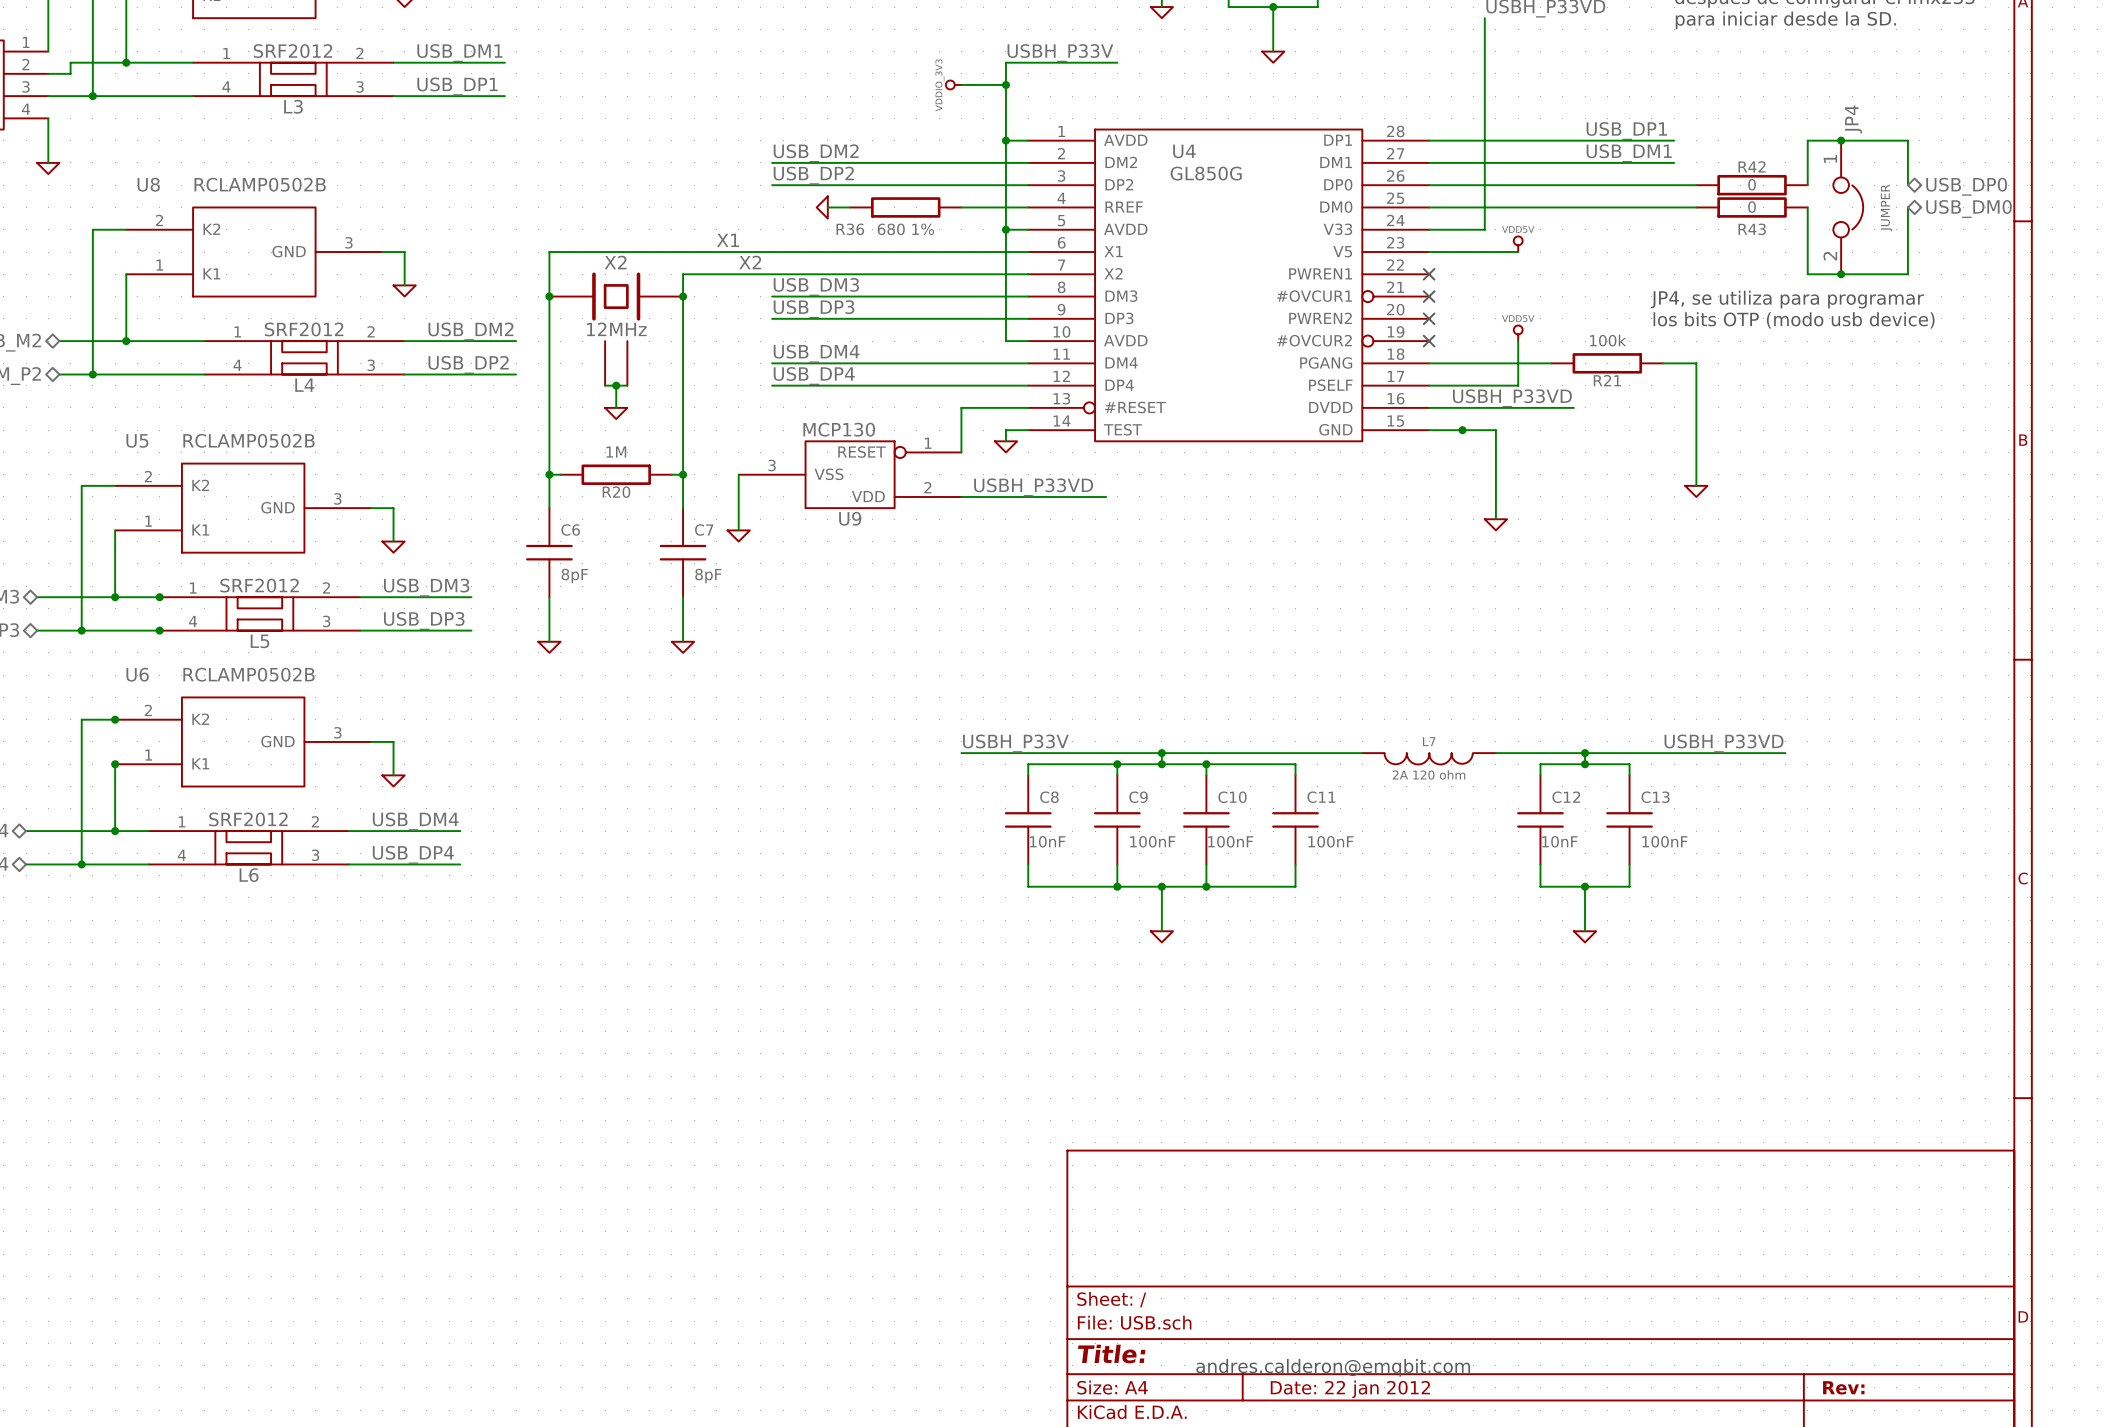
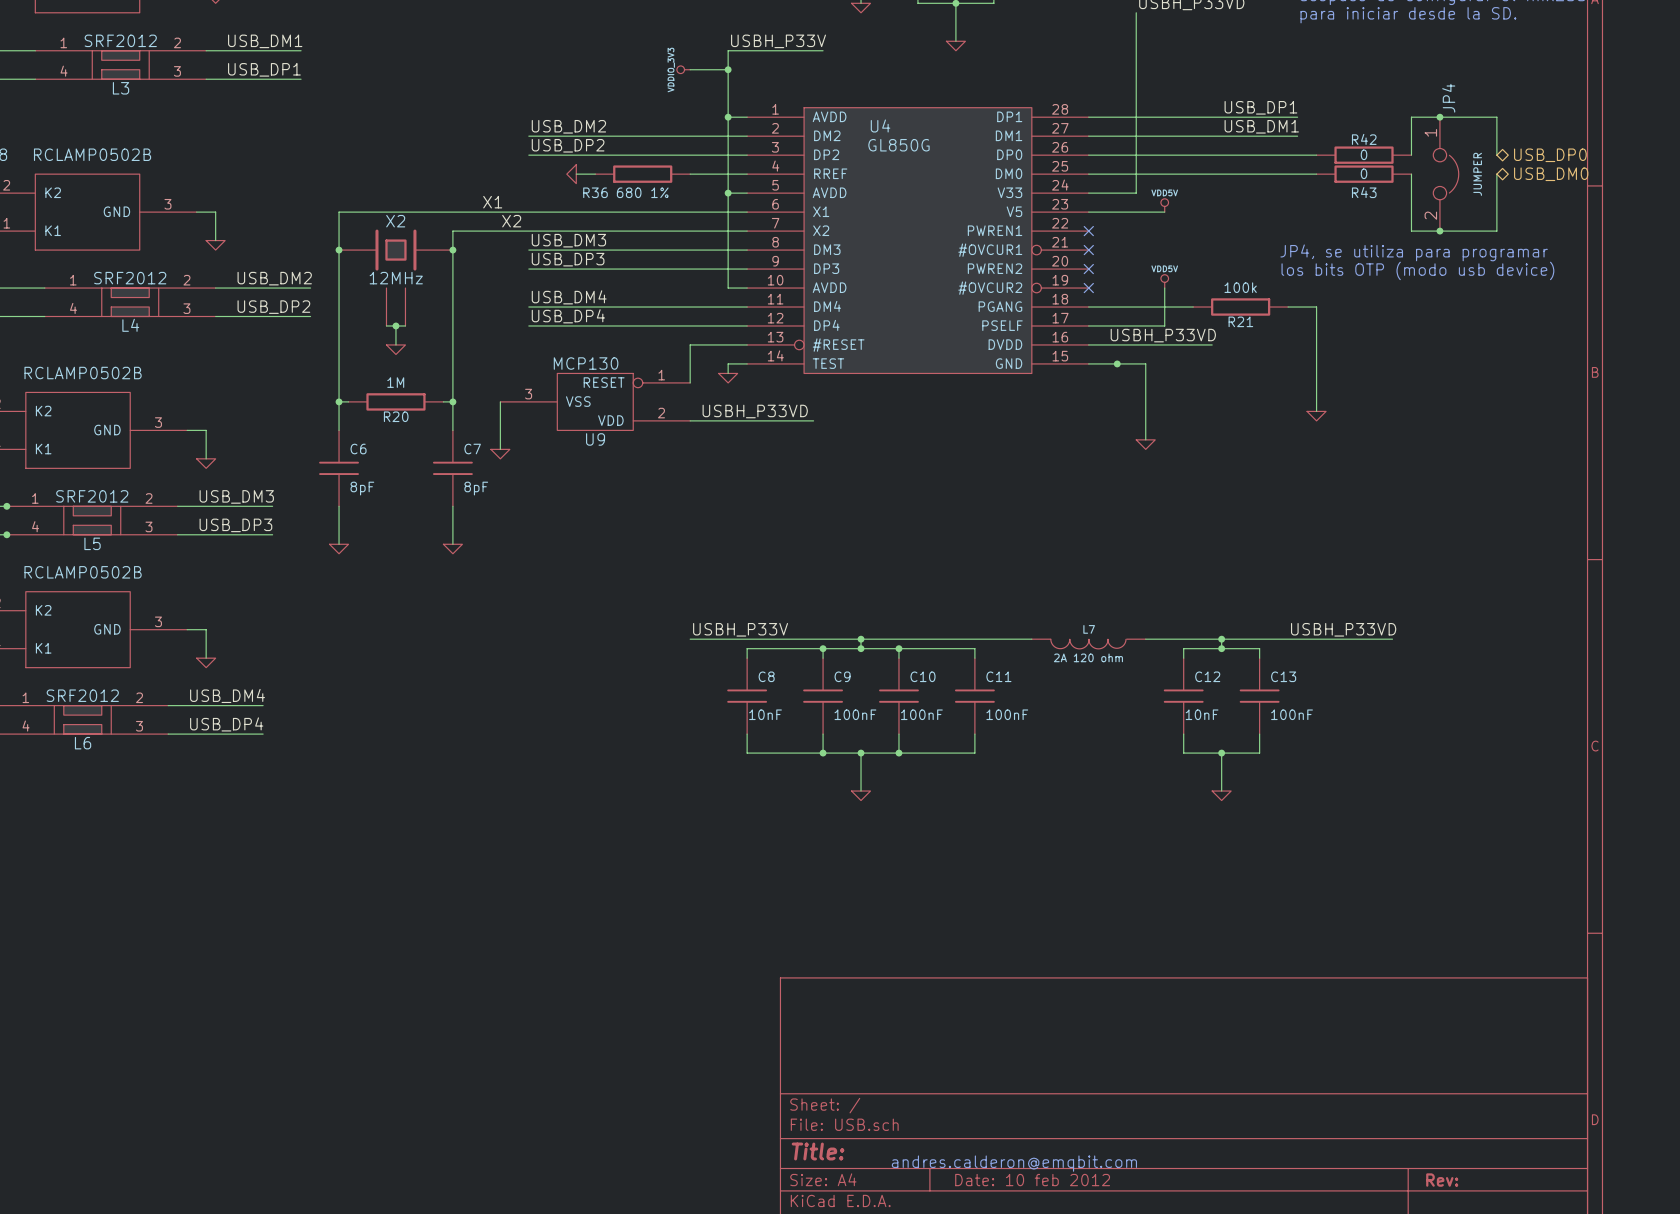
title block: Date: 22 jan 2012 (1350, 1389) -> Date: 10 feb 2012 (1032, 1180)

